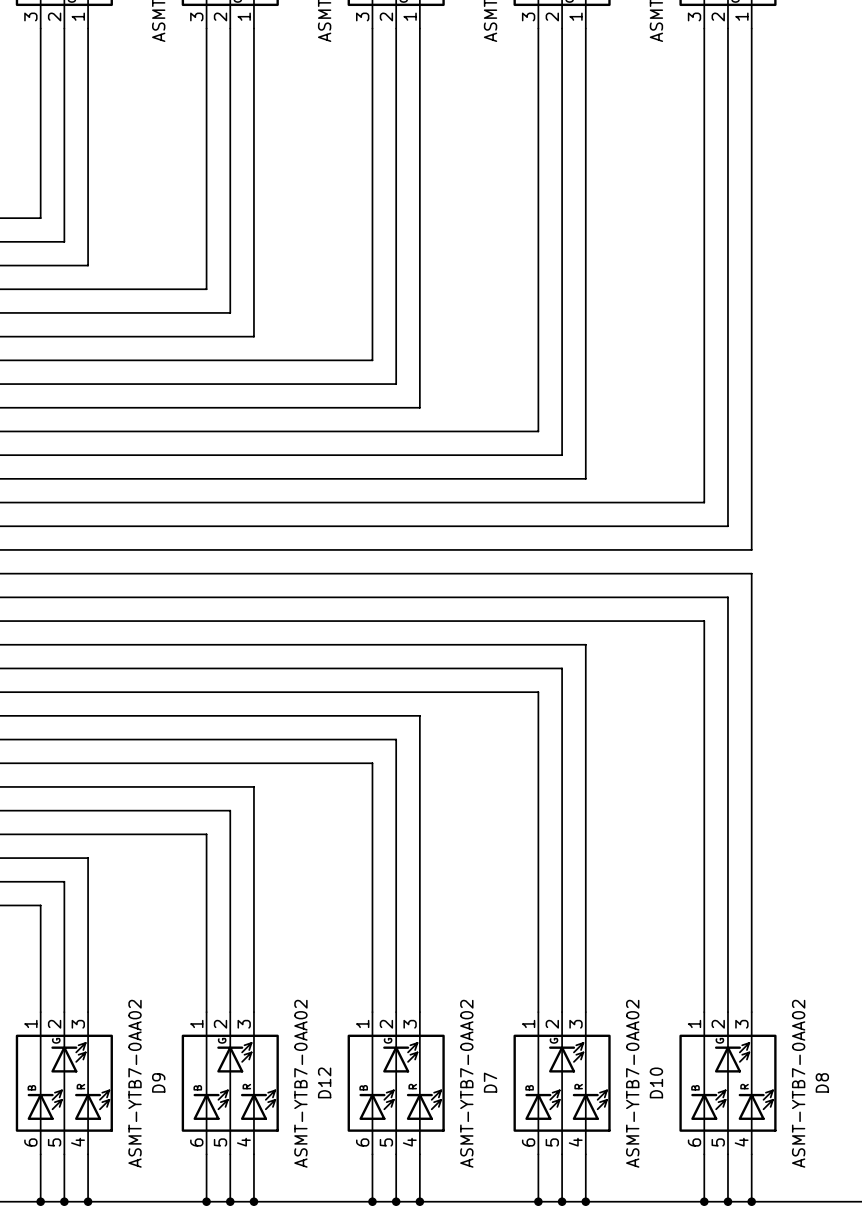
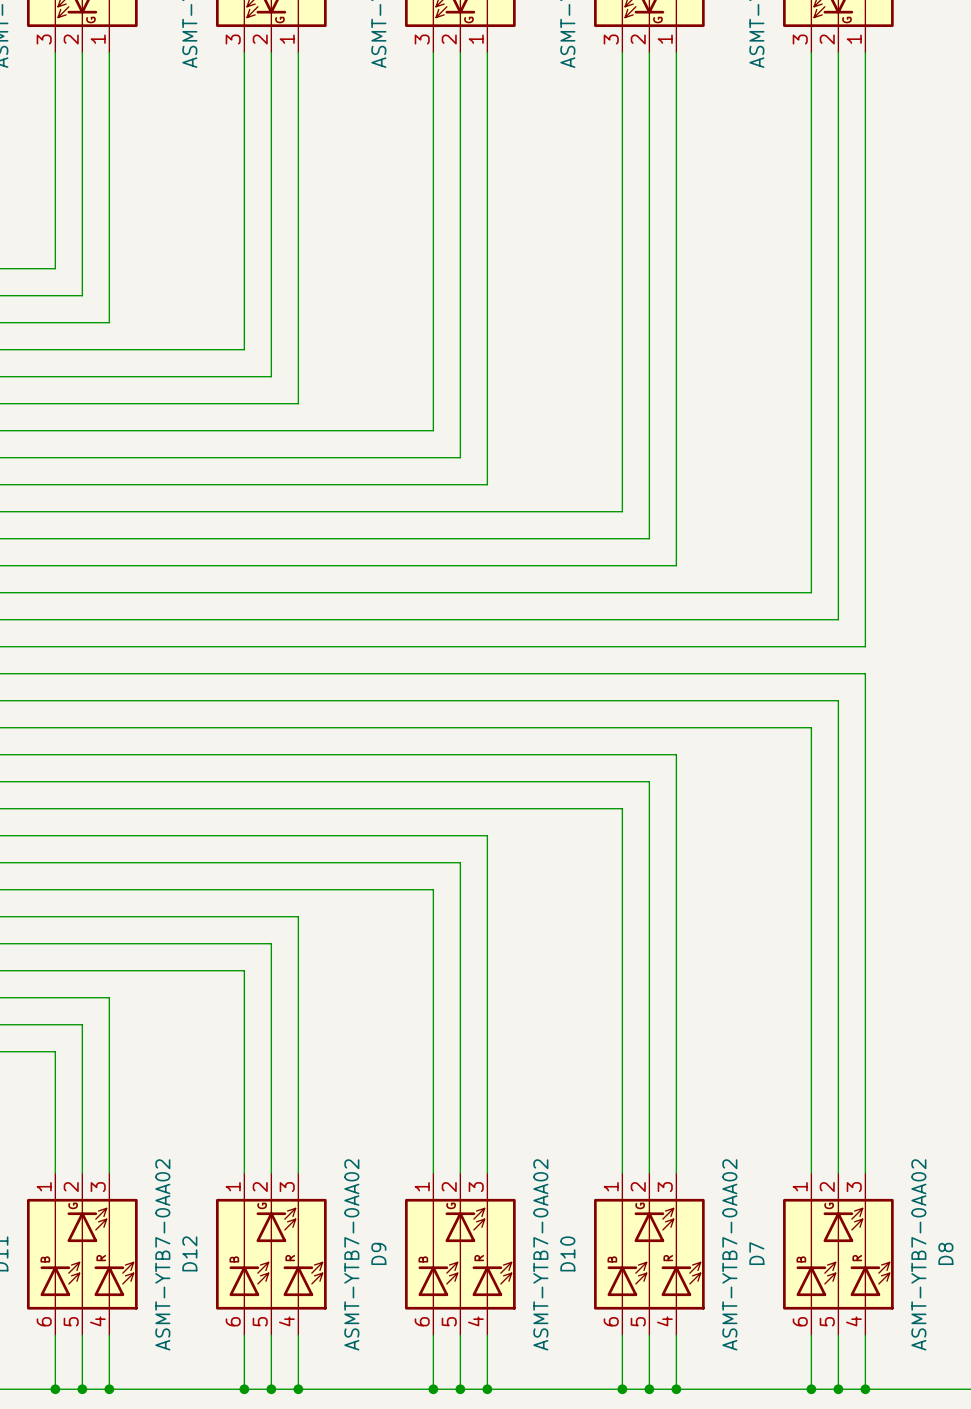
D9 name: D9 (158, 1082) -> D12 (189, 1253)
D12 name: D12 (324, 1082) -> D9 (378, 1253)
D7 name: D7 (490, 1082) -> D10 (567, 1253)
D10 name: D10 (656, 1082) -> D7 (756, 1253)

